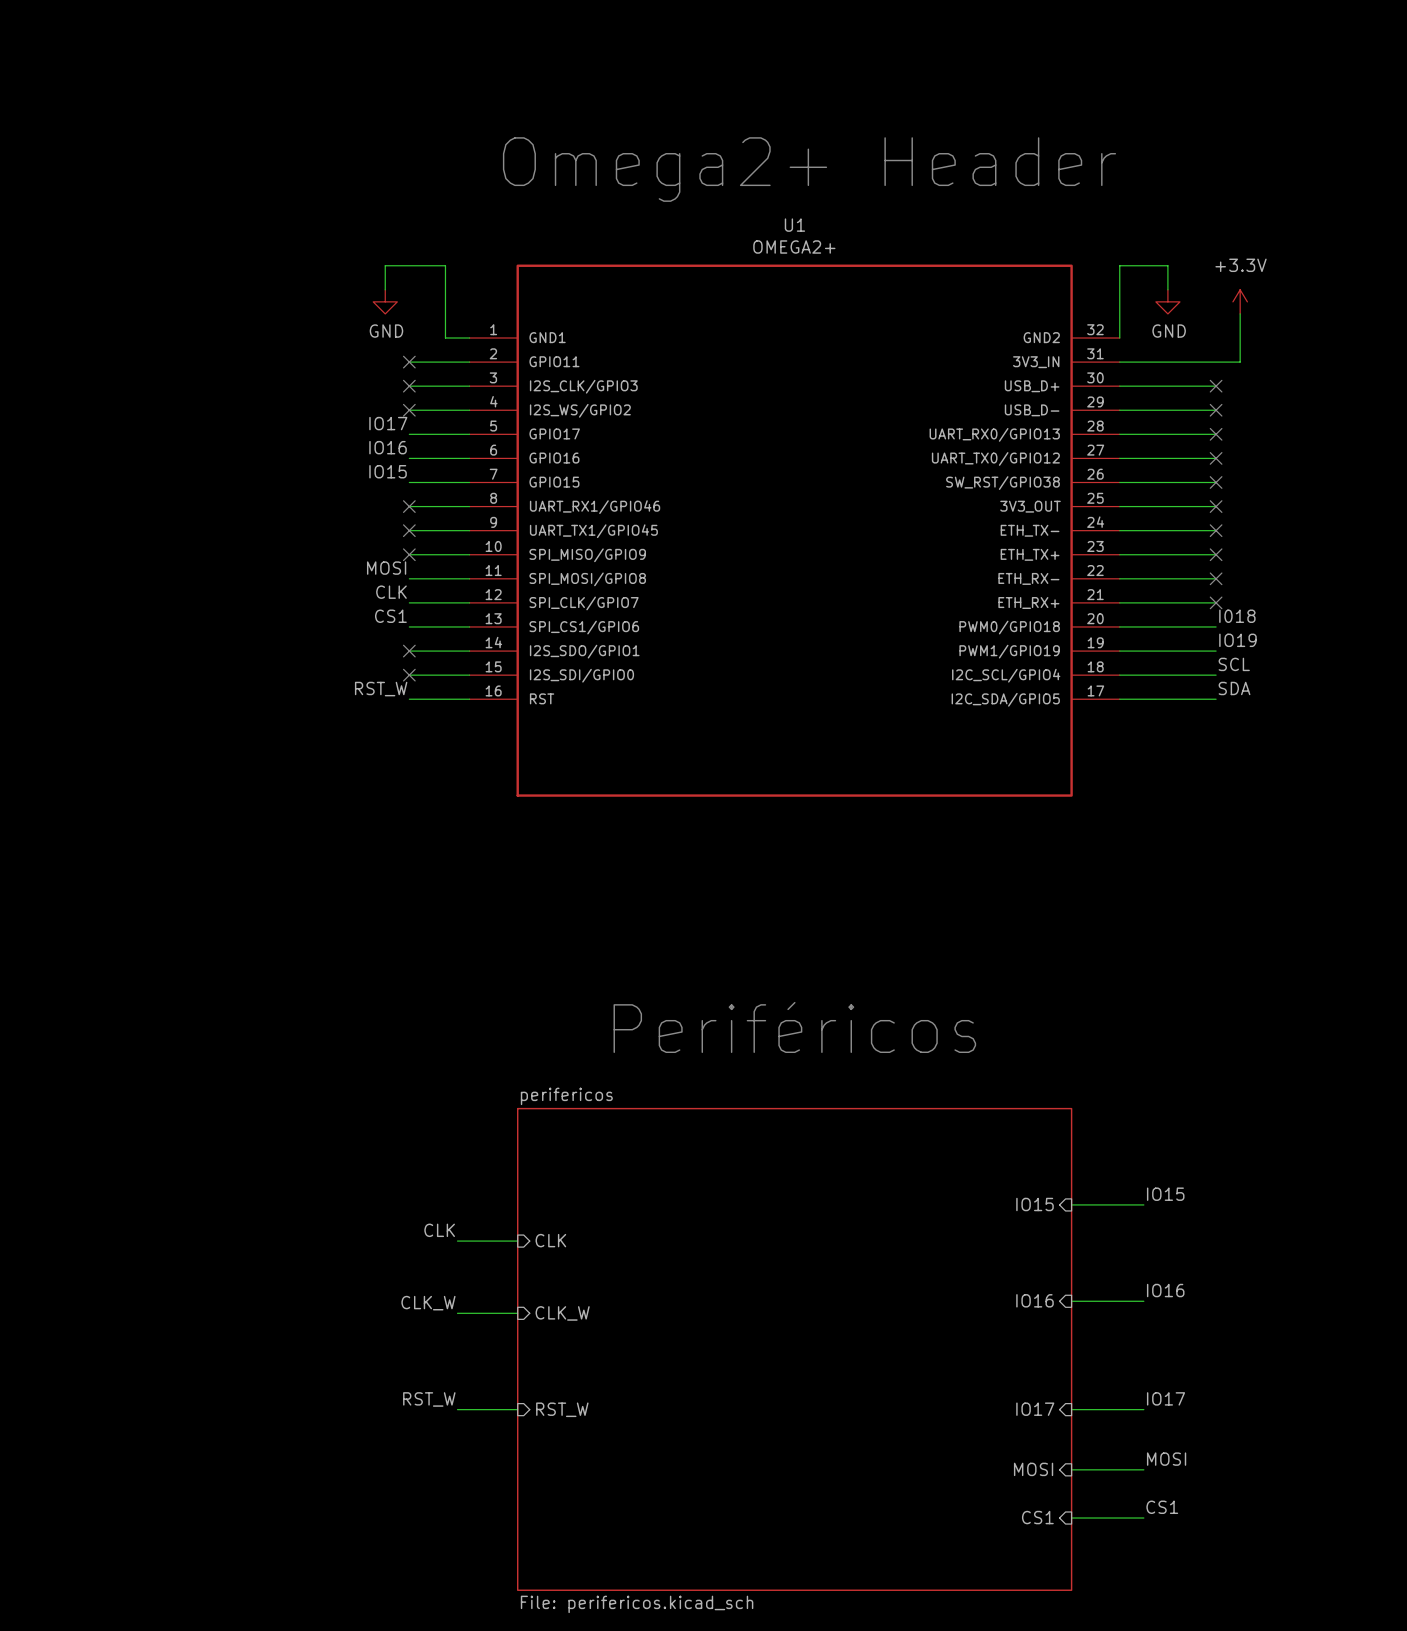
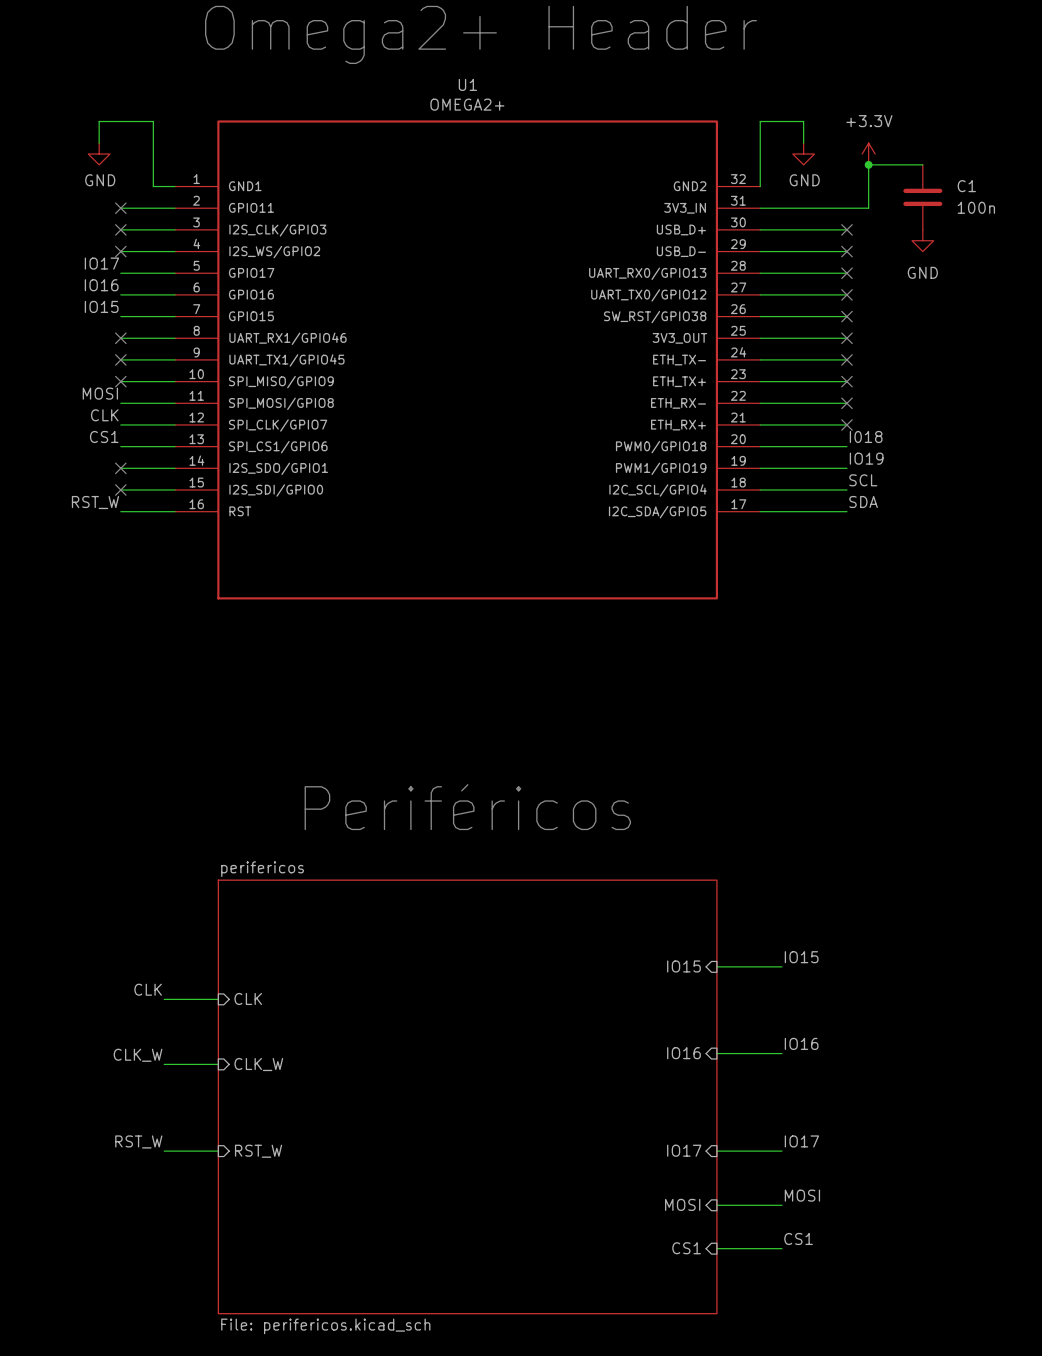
wire: none -> (868, 164) (922, 164)
junction: none -> (868, 164)
C1: none -> 100n (922, 197)
power symbol: none -> GND (922, 240)

